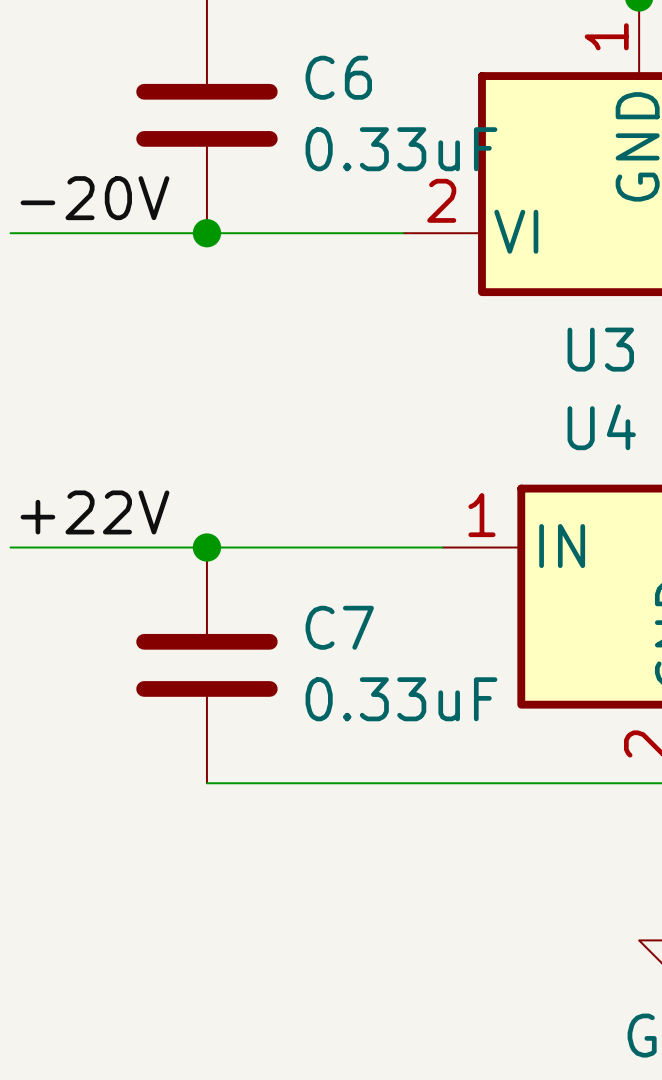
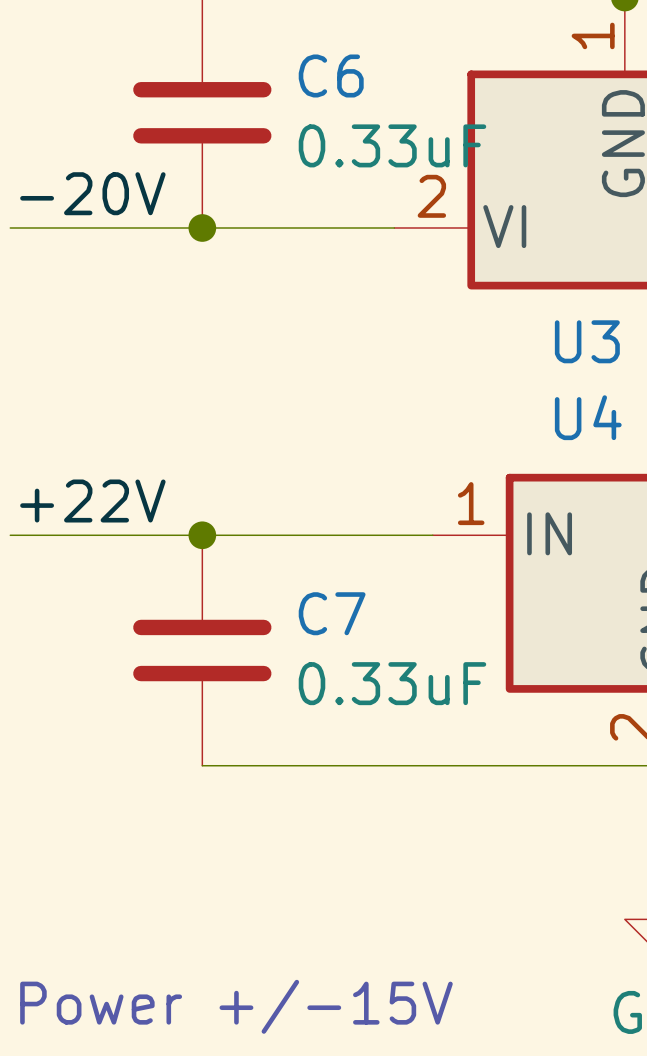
text: none -> Power +/-15V (236, 1006)

